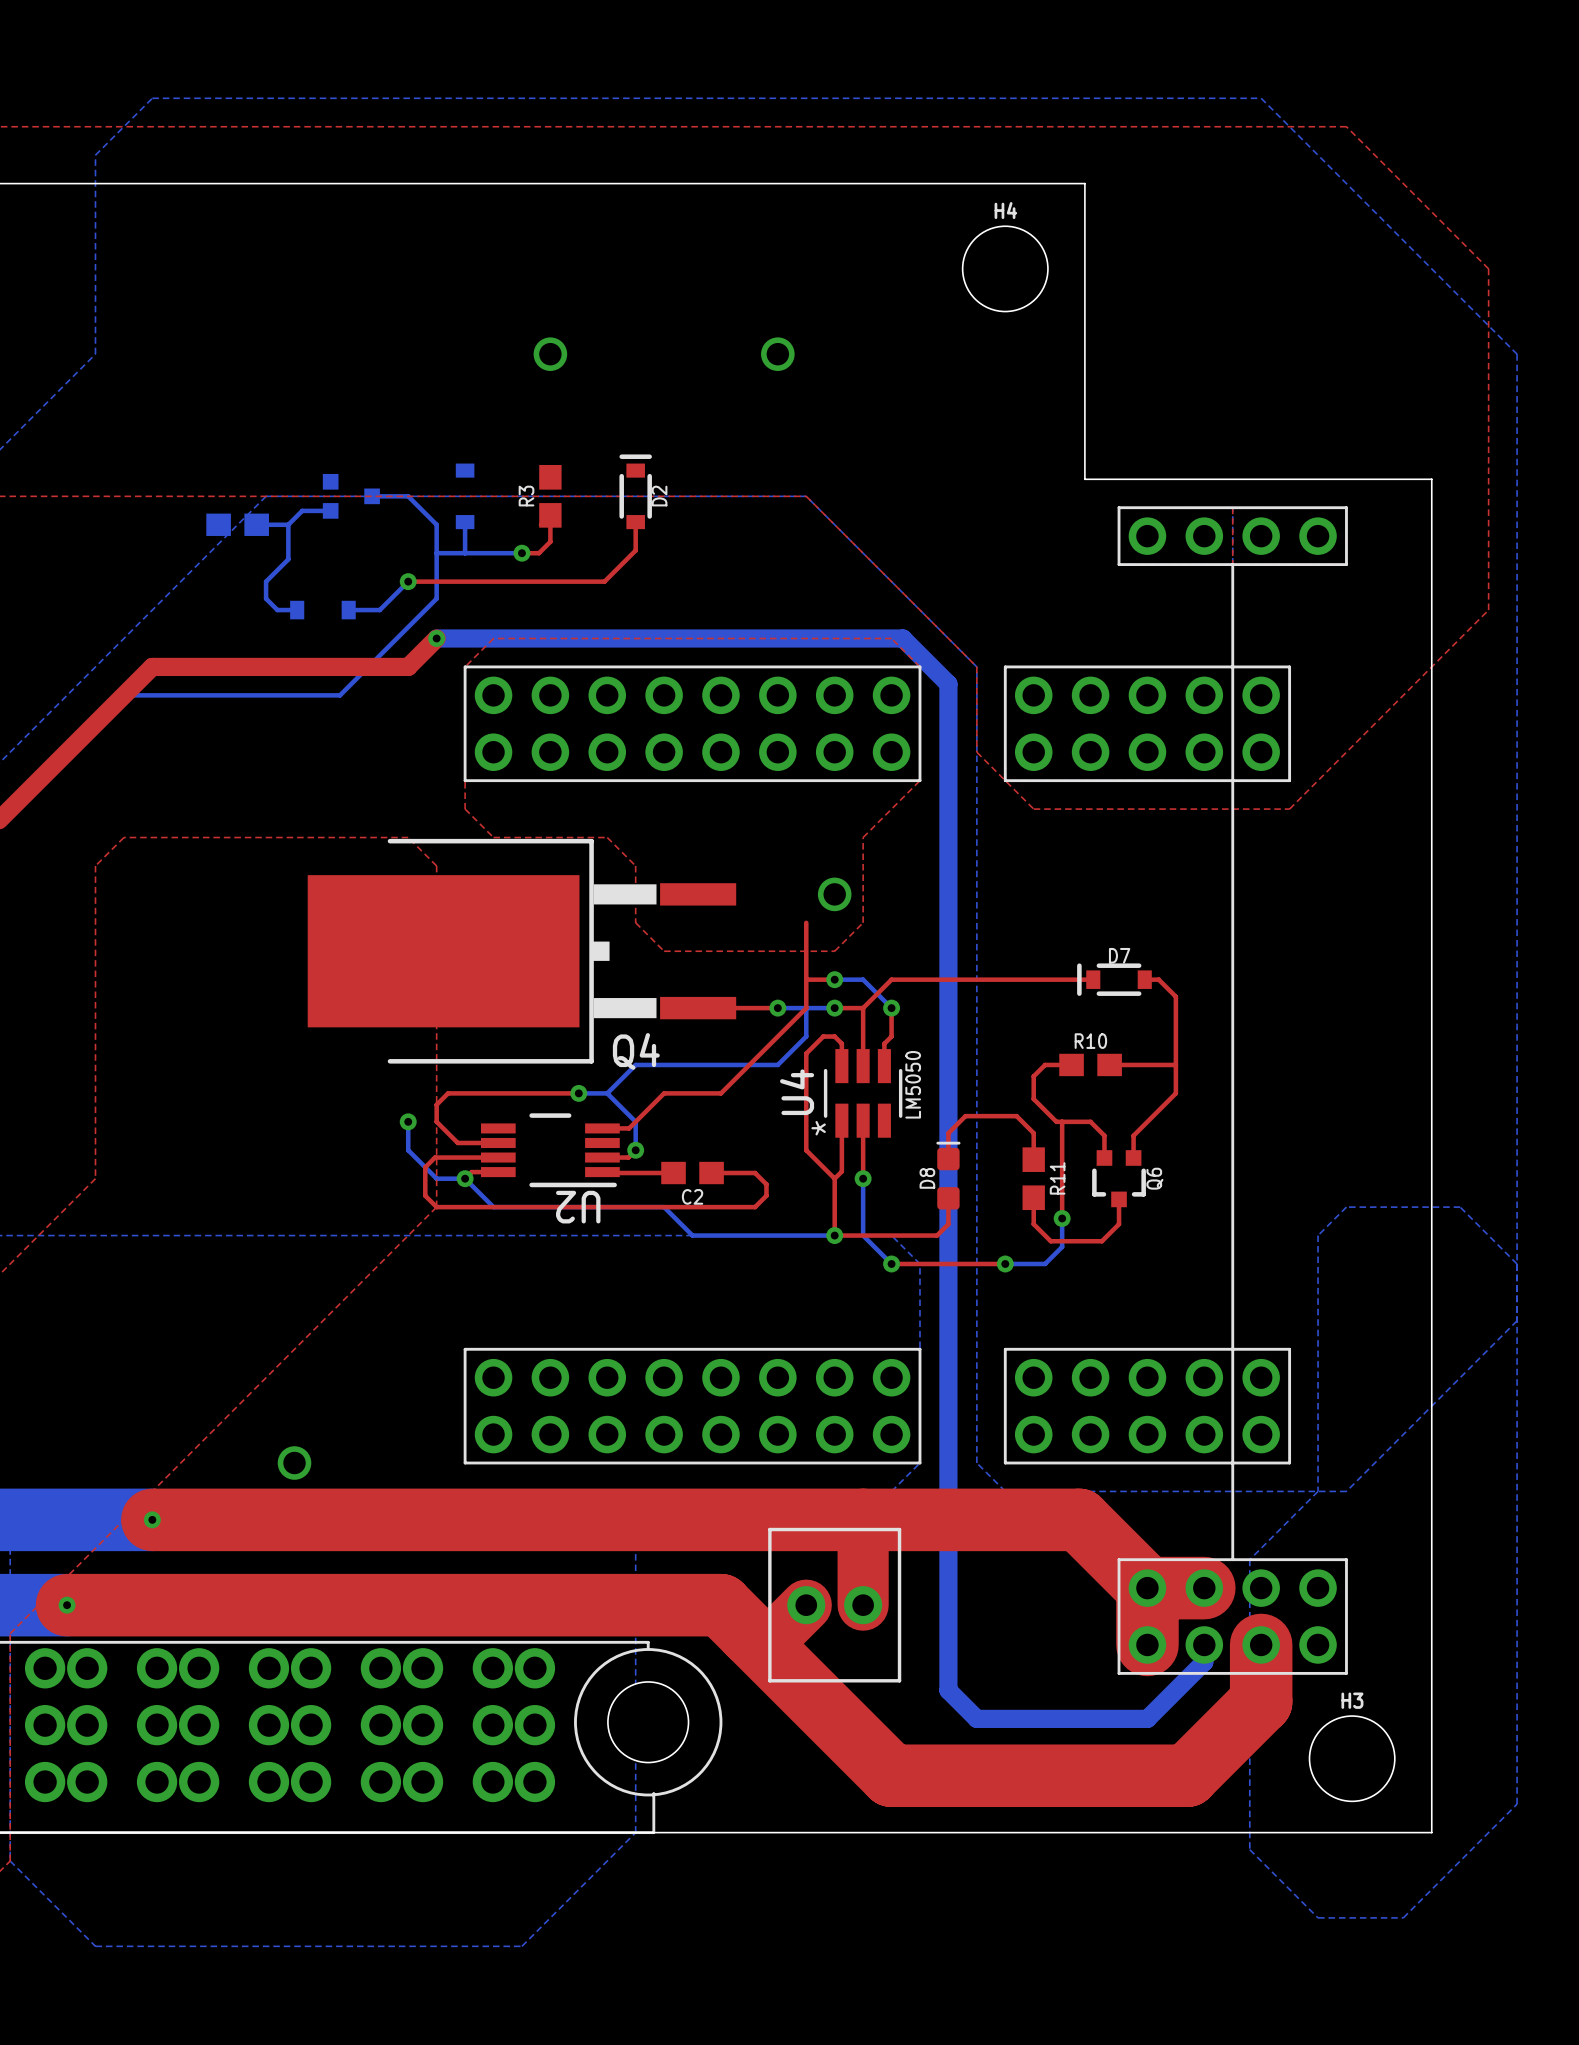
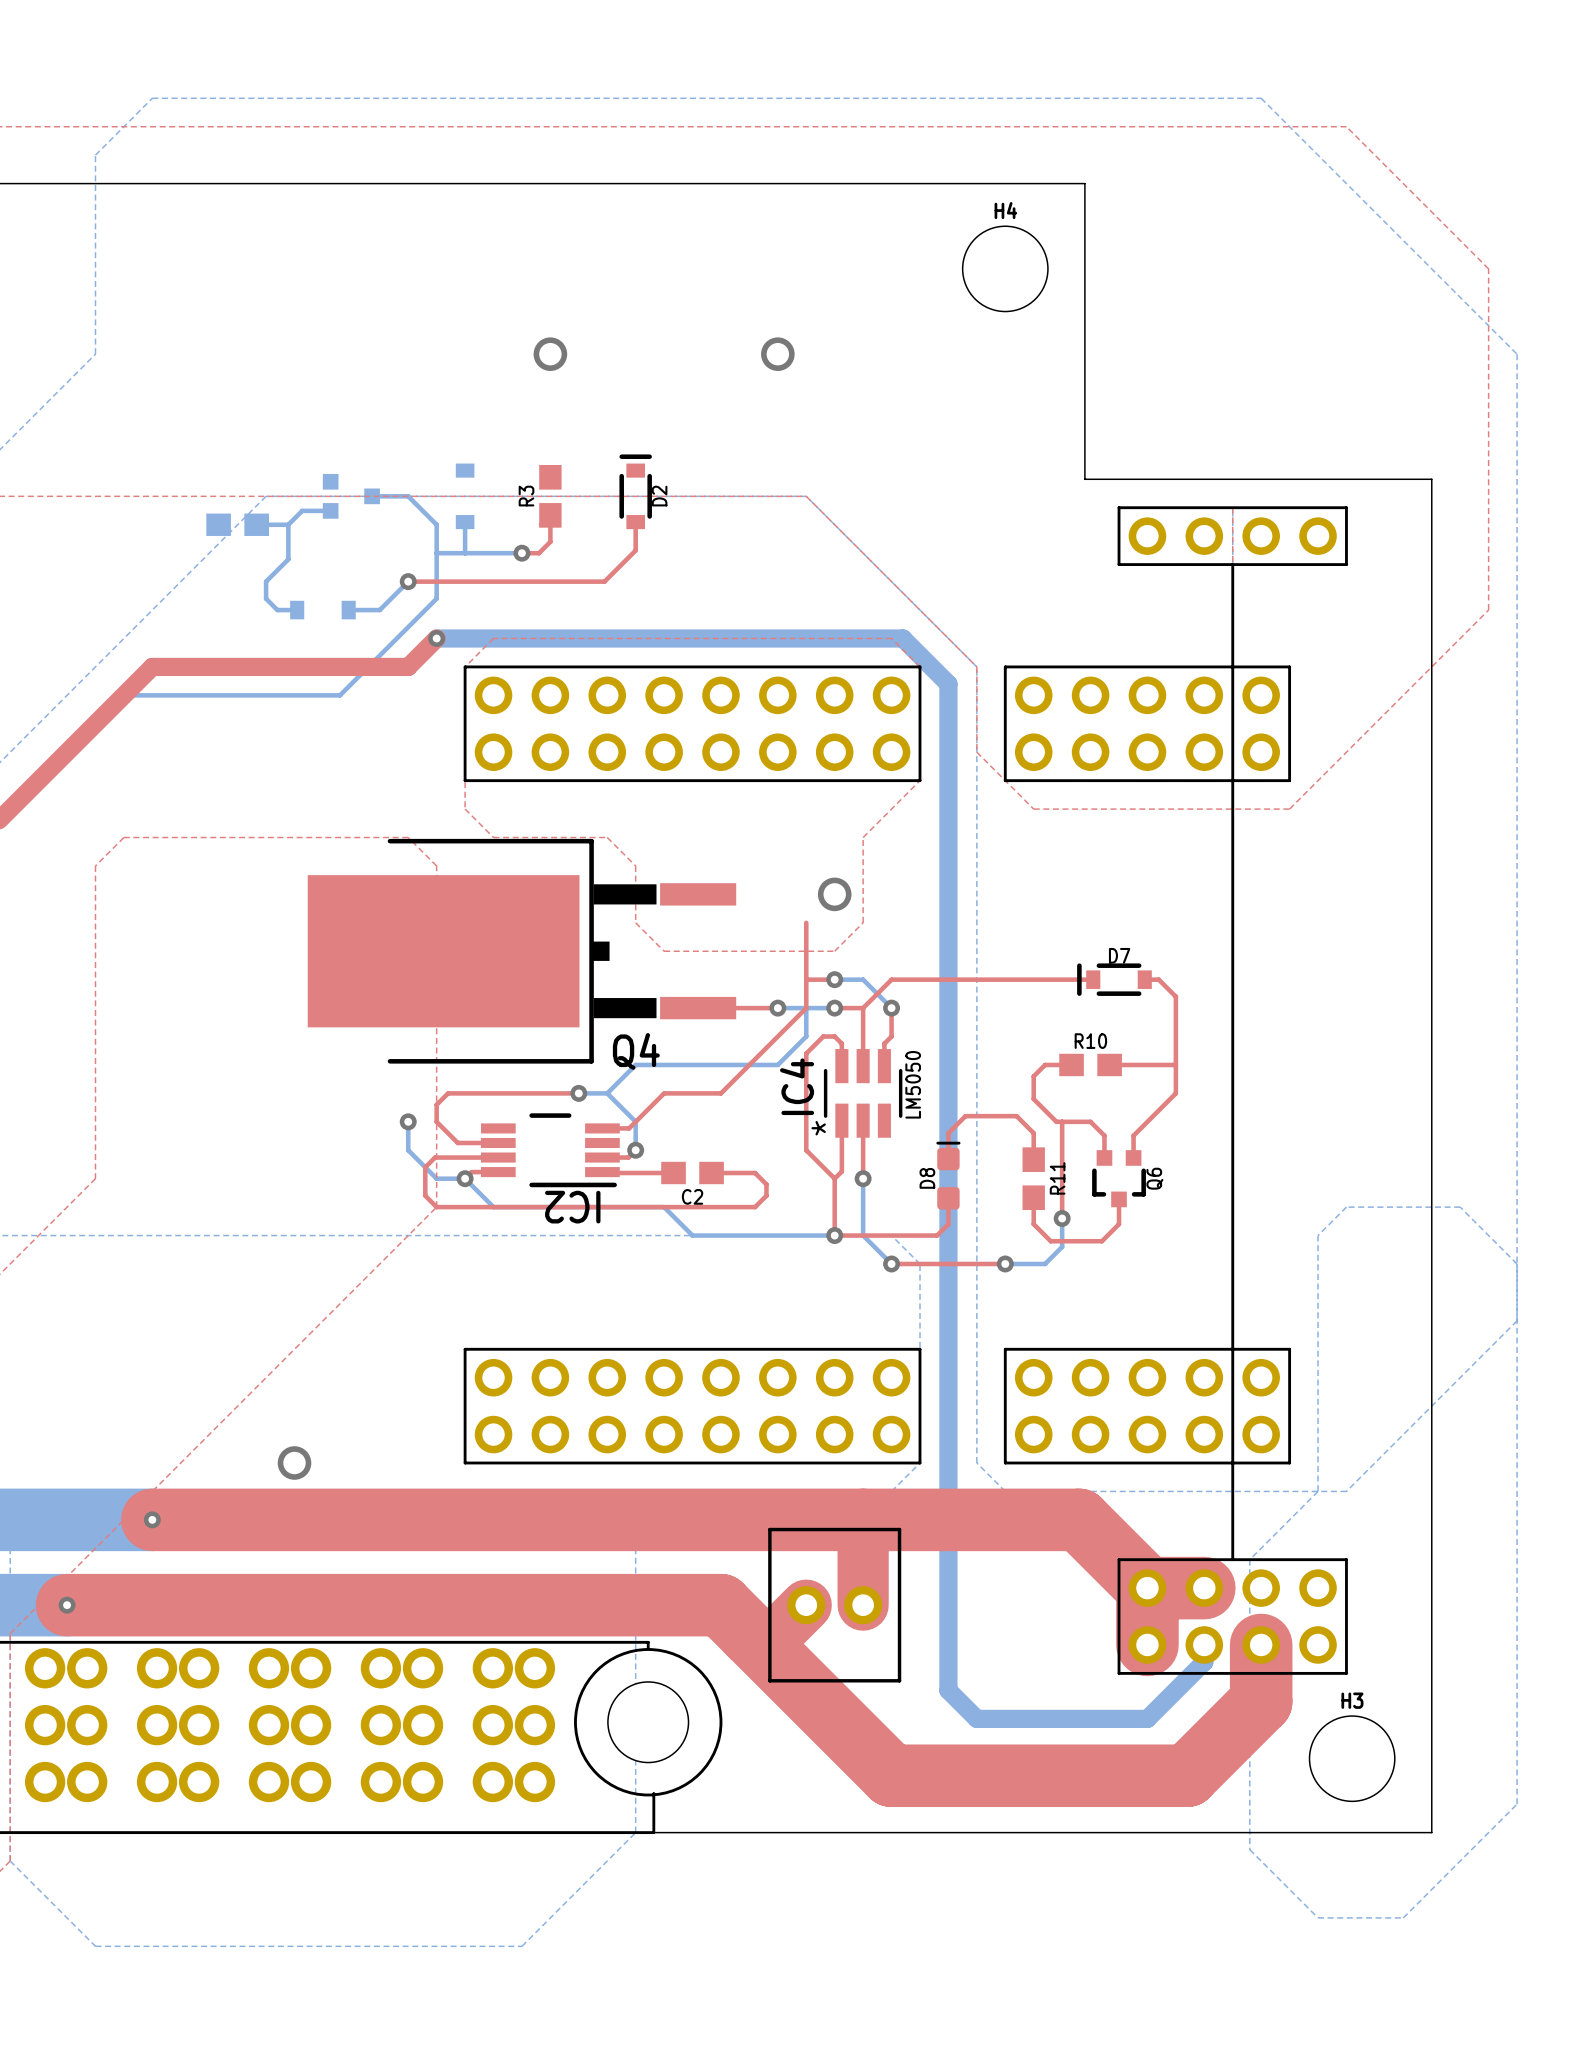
U4 name: U4 (797, 1092) -> IC4 (797, 1086)
U2 name: U2 (578, 1207) -> IC2 (572, 1207)

